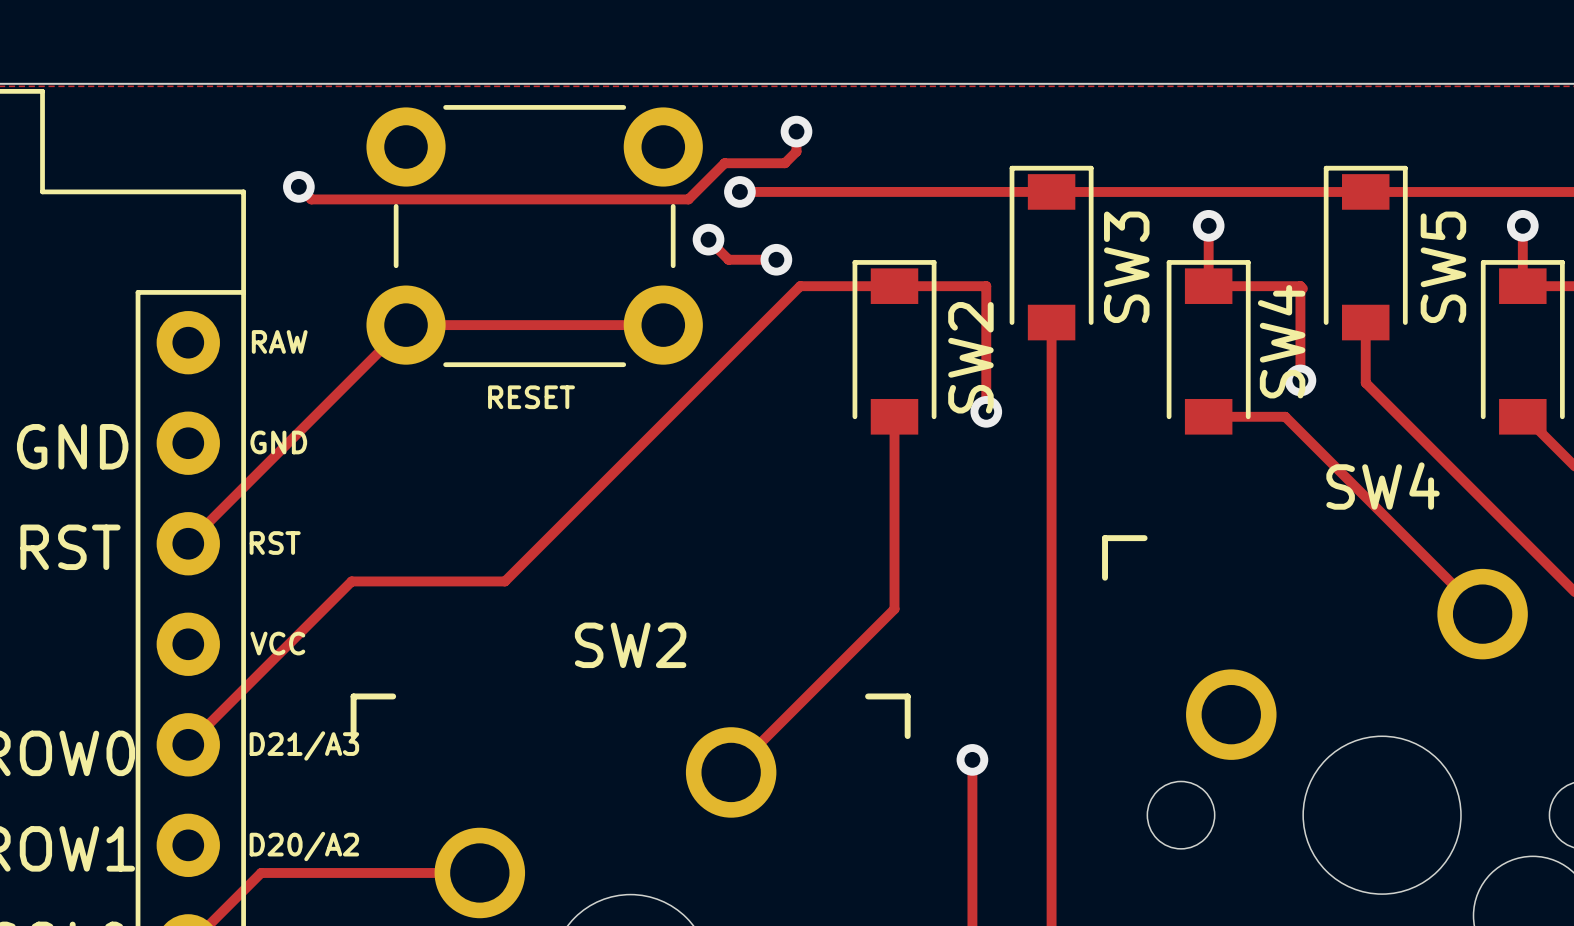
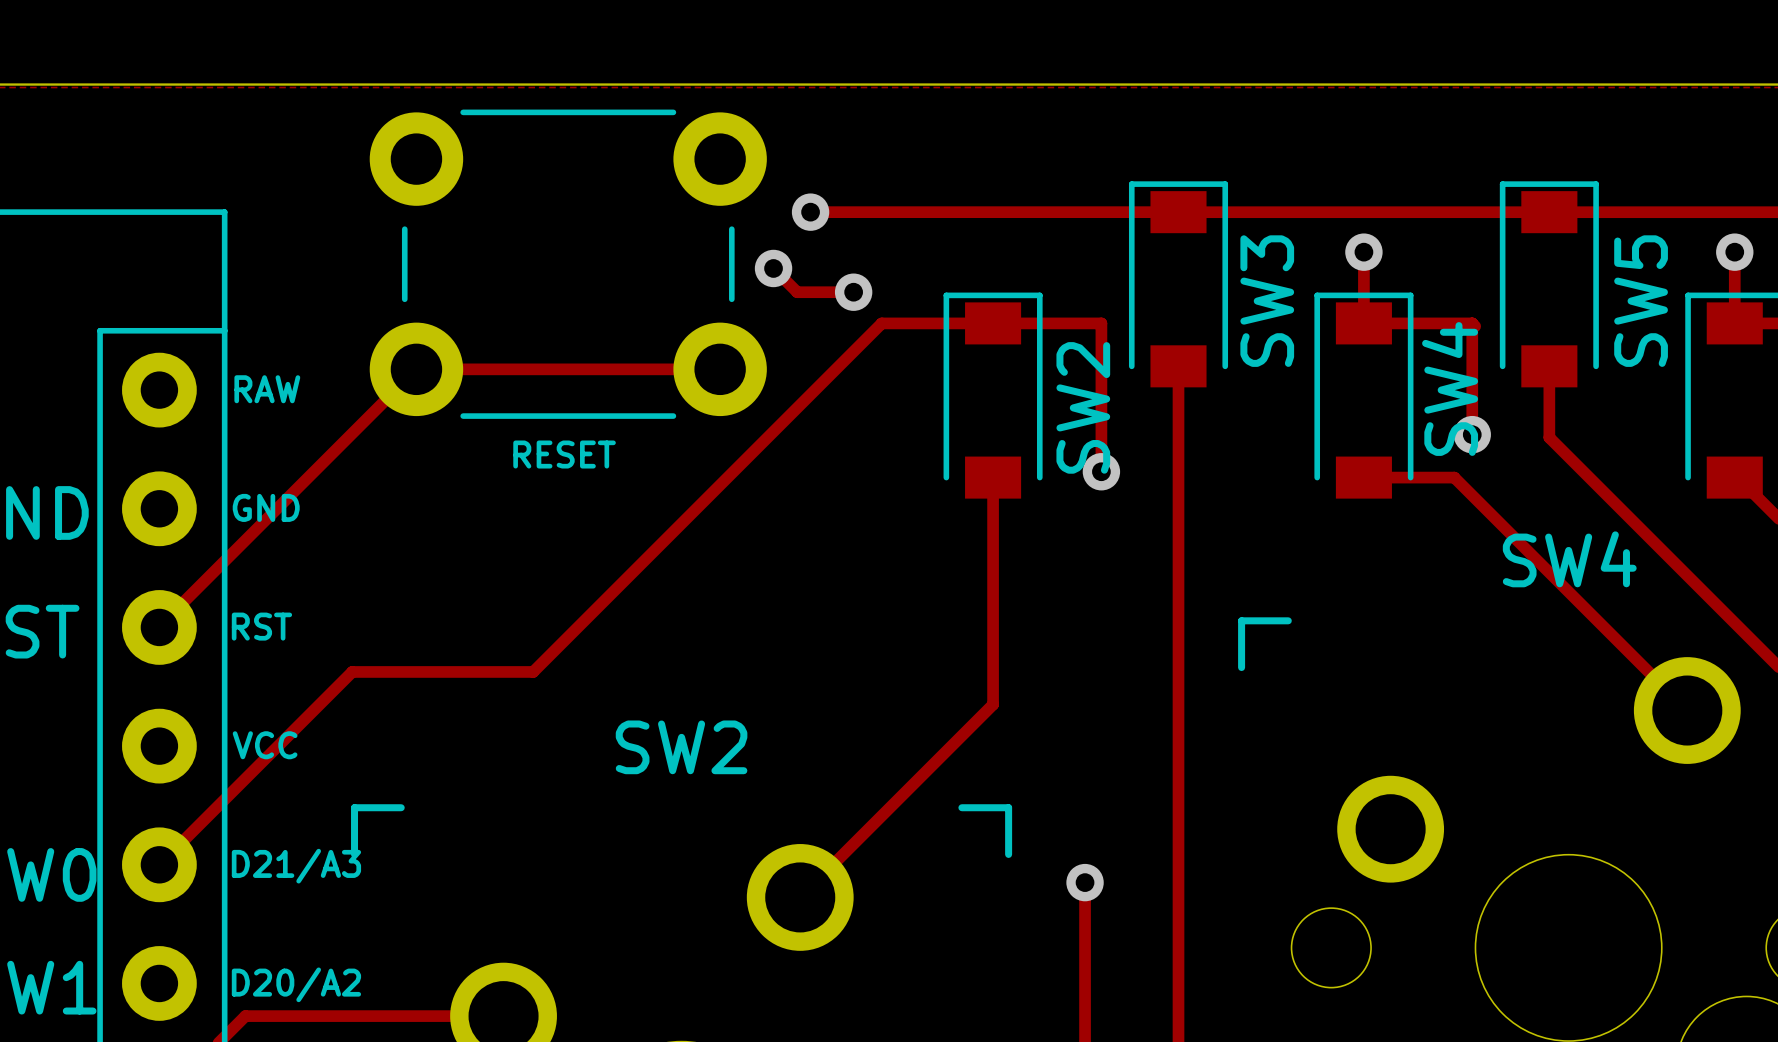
track: (796, 131) (796, 151) (784, 163) (724, 163) (688, 199) (311, 199) (298, 186) -> none
via: (796, 131) -> none
via: (298, 186) -> none

